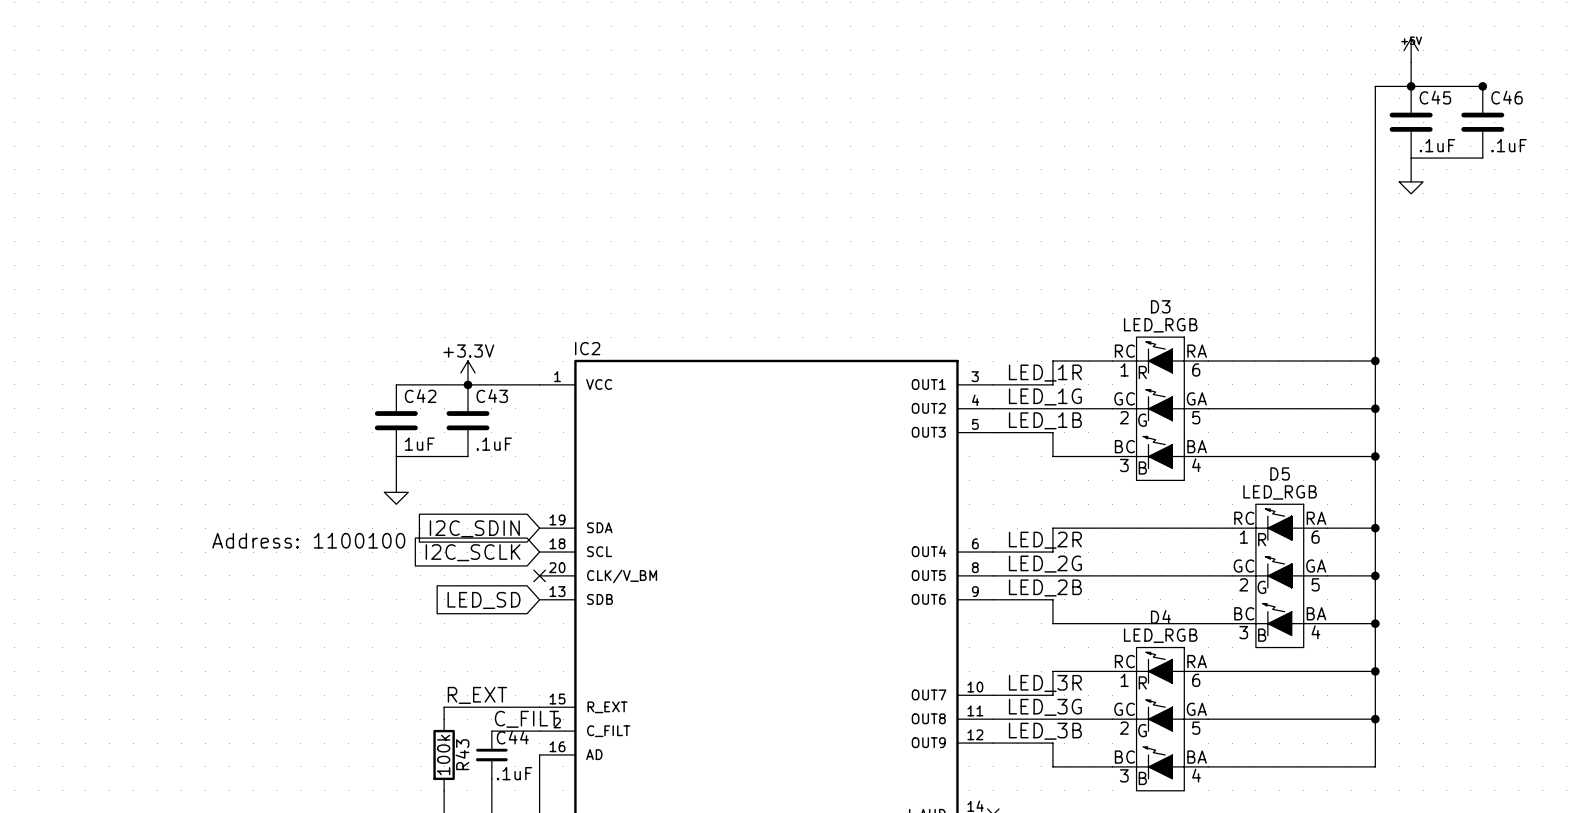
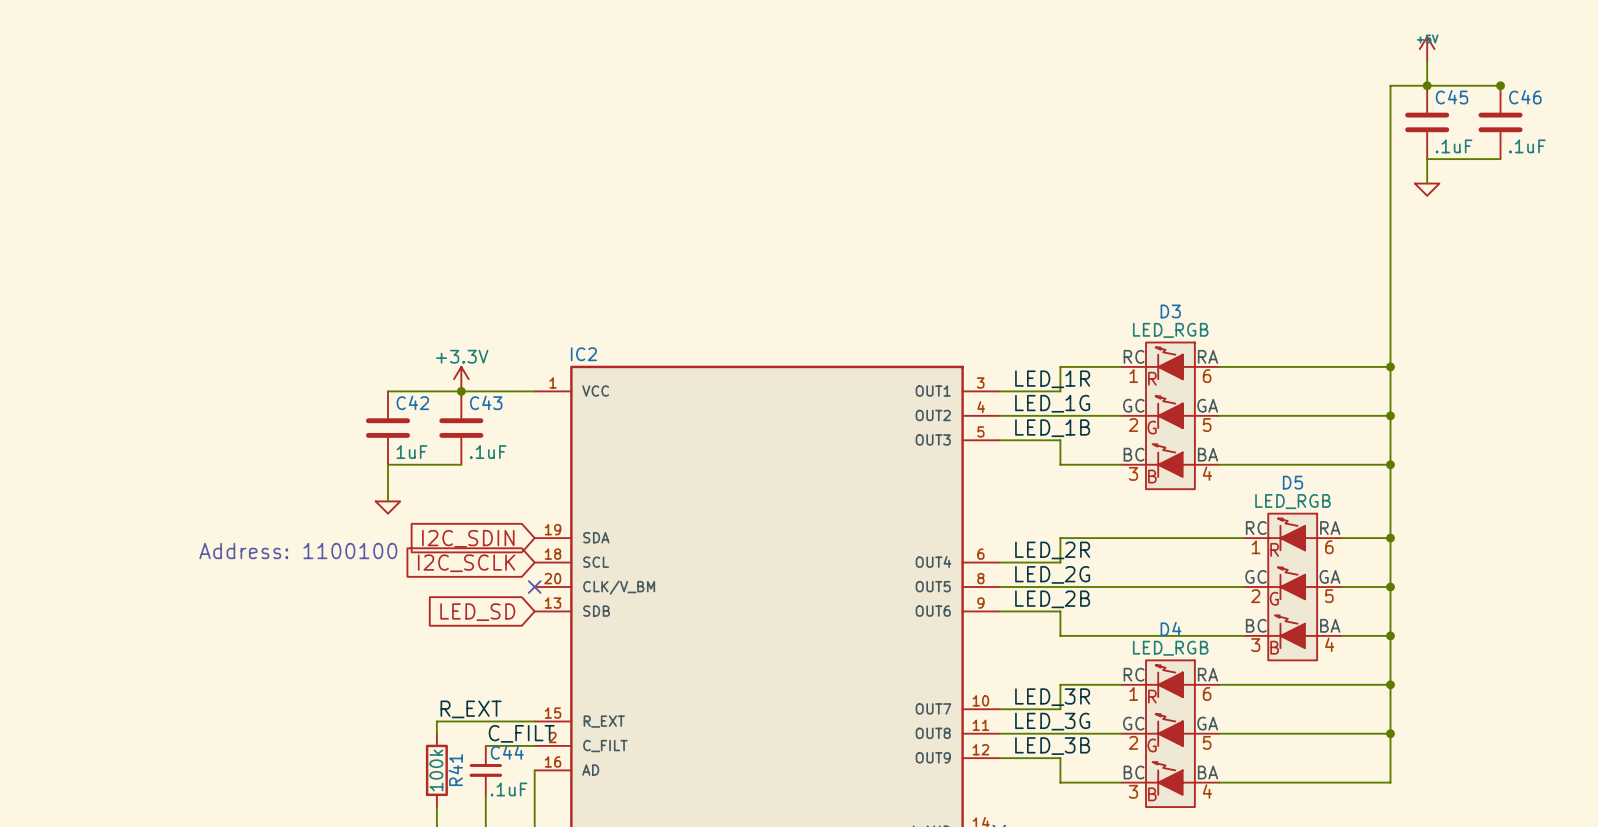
R43 name: R43 (462, 754) -> R41 (455, 770)

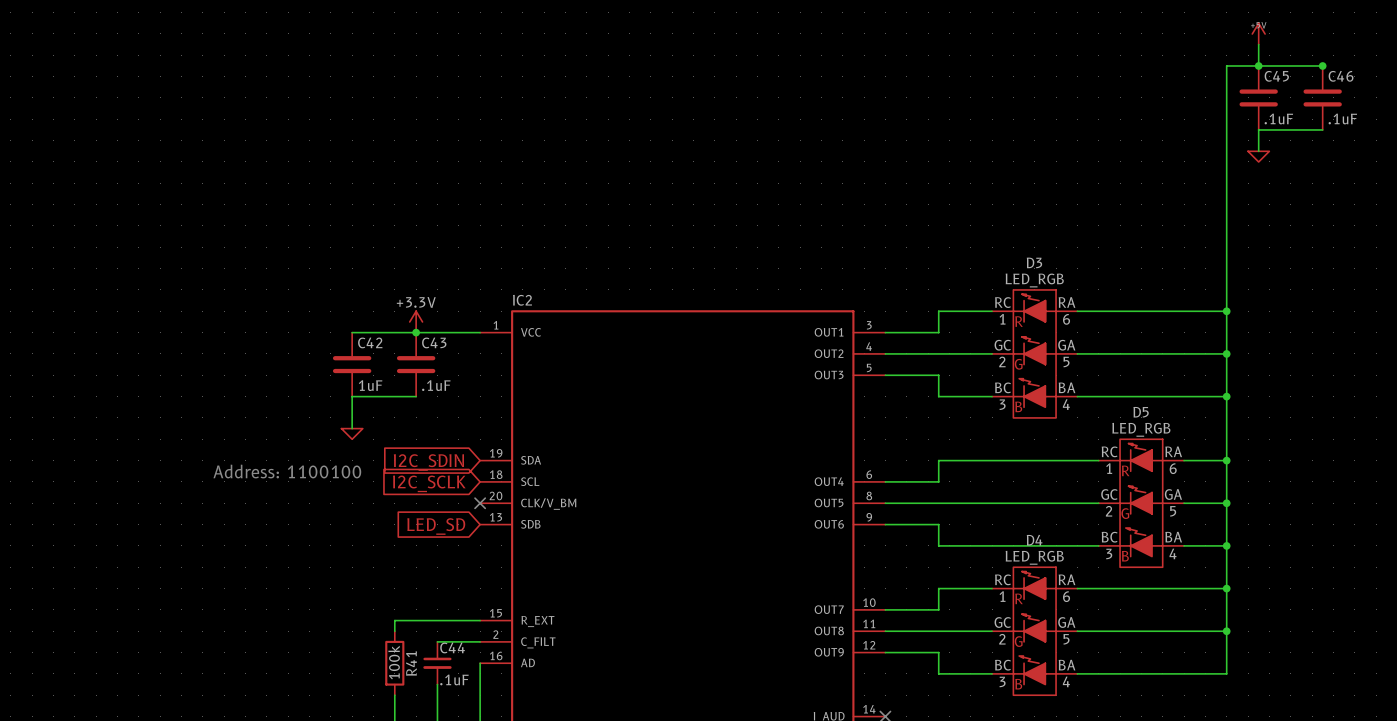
label: LED_1R (1052, 379) -> none
label: LED_1G (1052, 403) -> none
label: LED_1B (1052, 428) -> none
label: LED_2R (1052, 550) -> none
label: LED_2G (1052, 574) -> none
label: LED_2B (1052, 599) -> none
label: LED_3R (1052, 697) -> none
label: R_EXT (471, 709) -> none
label: LED_3G (1052, 721) -> none
label: C_FILT (521, 733) -> none
label: LED_3B (1052, 746) -> none

